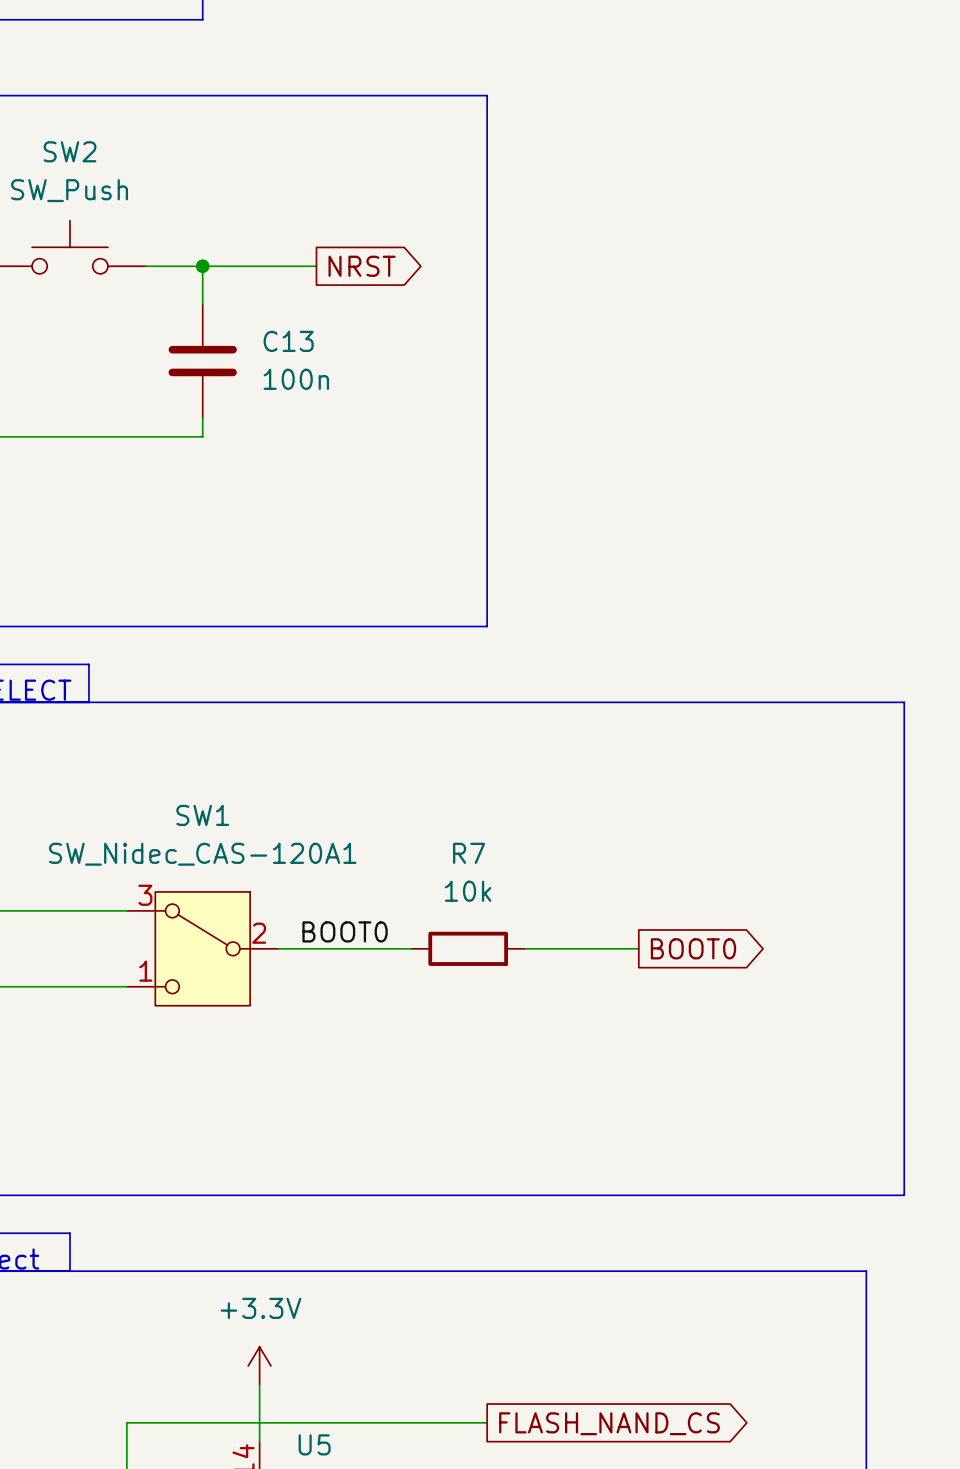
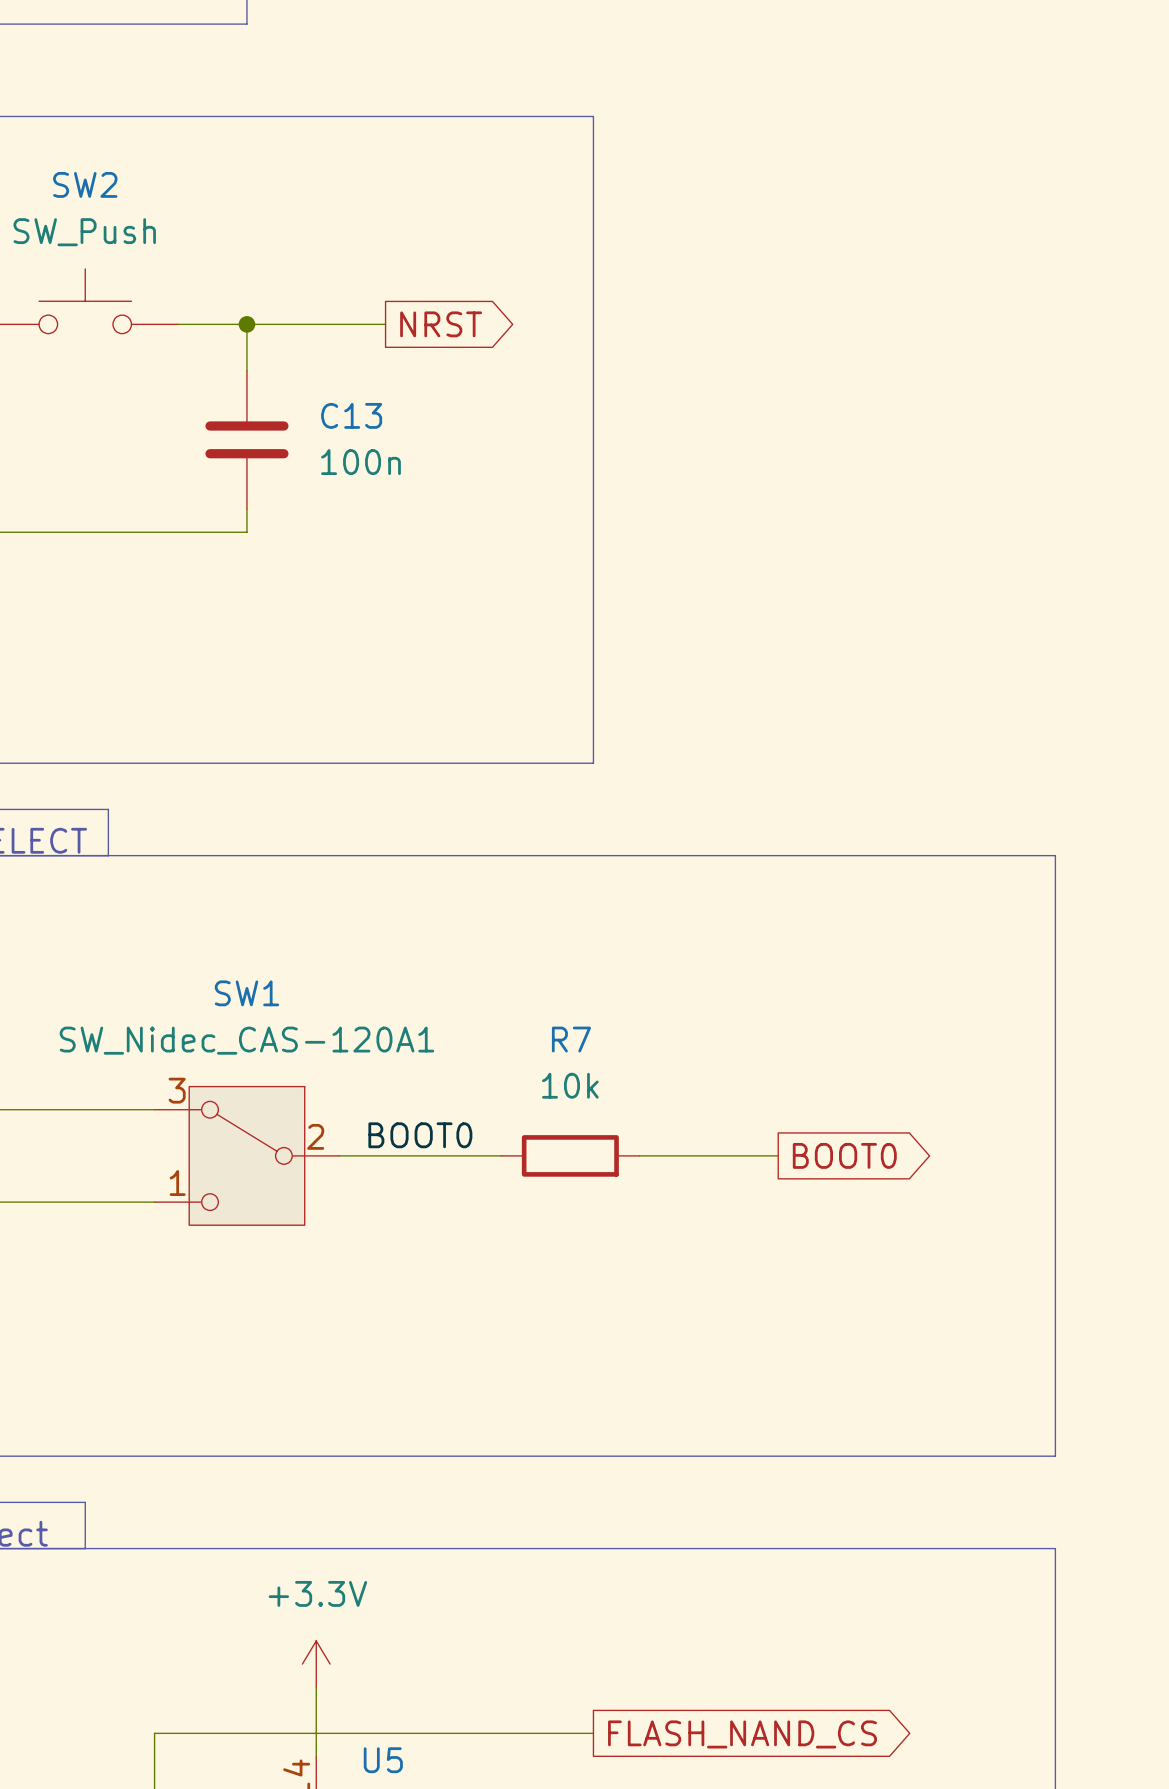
line: (866, 702) (904, 702) (904, 1195) (866, 1195) -> (1055, 855) (1055, 1456)

